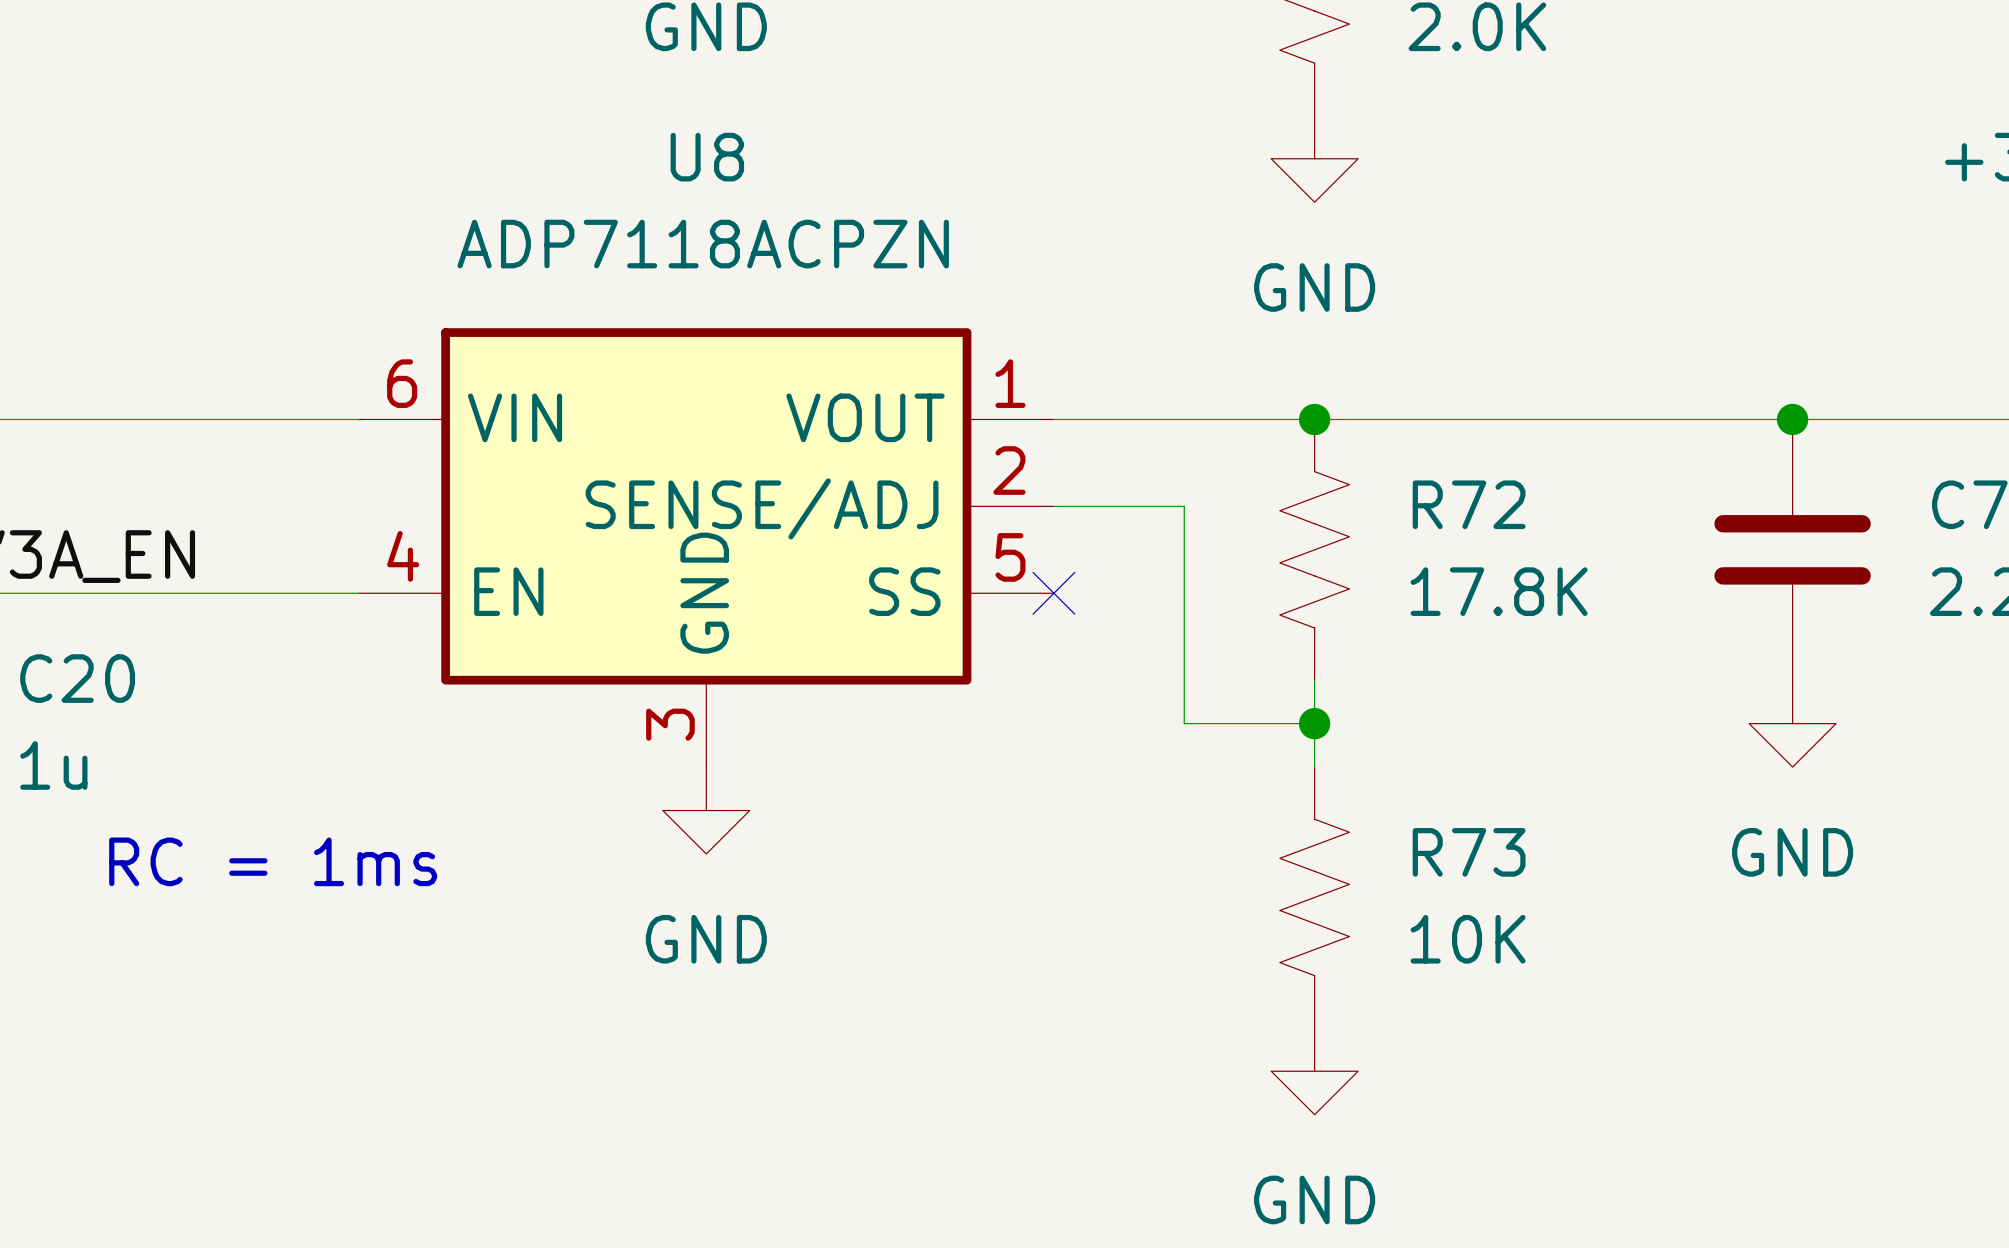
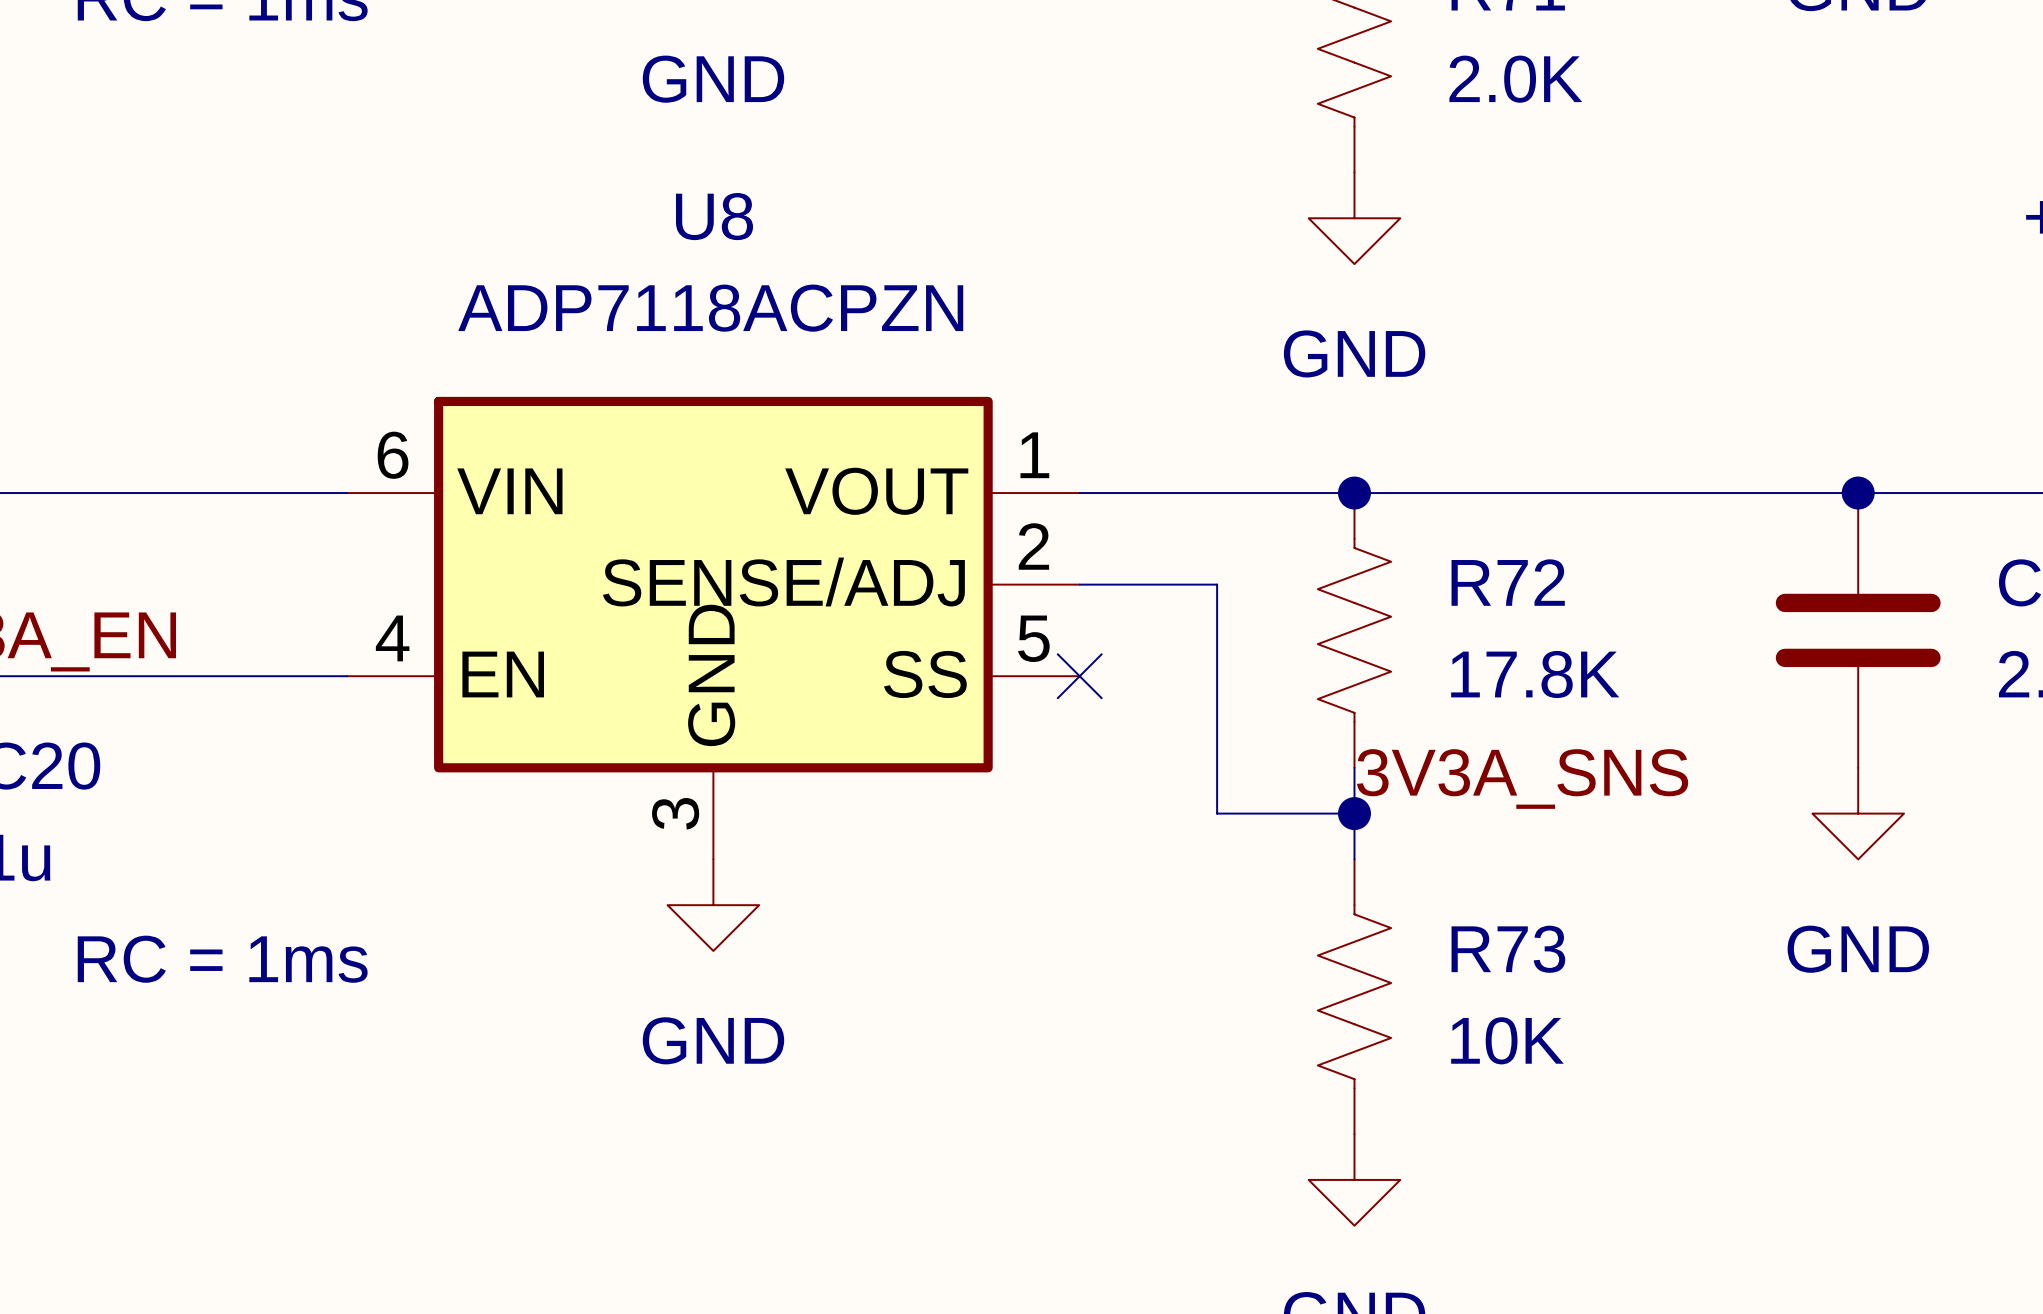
label: none -> 3V3A_SNS (1522, 778)

